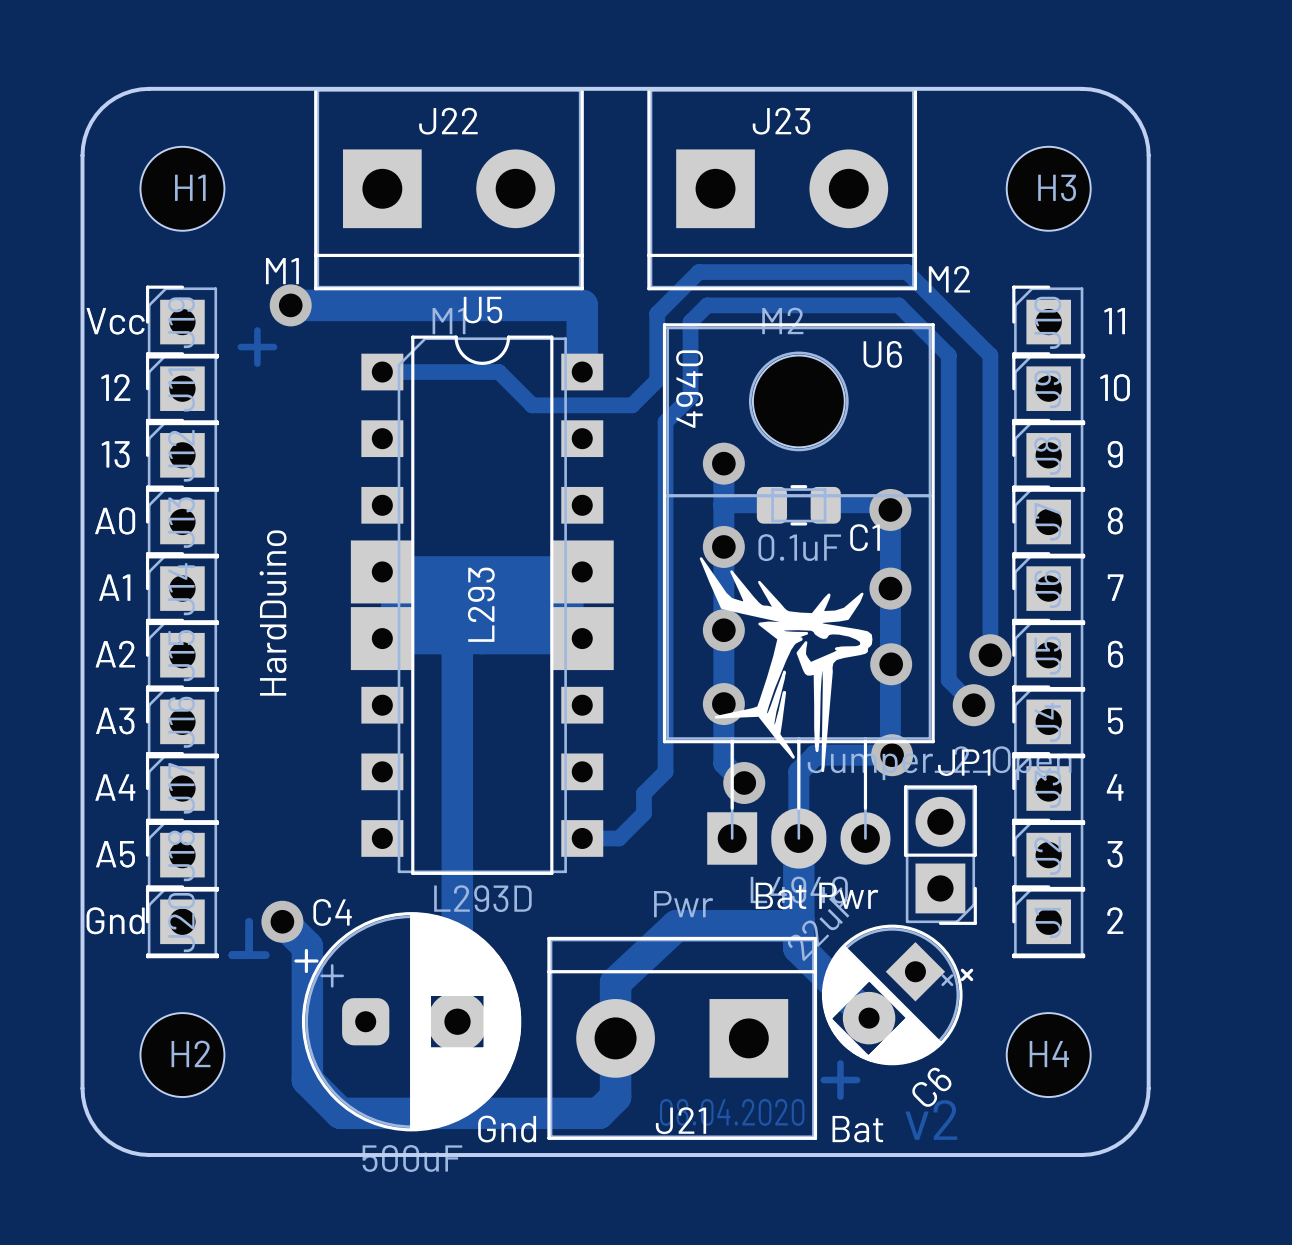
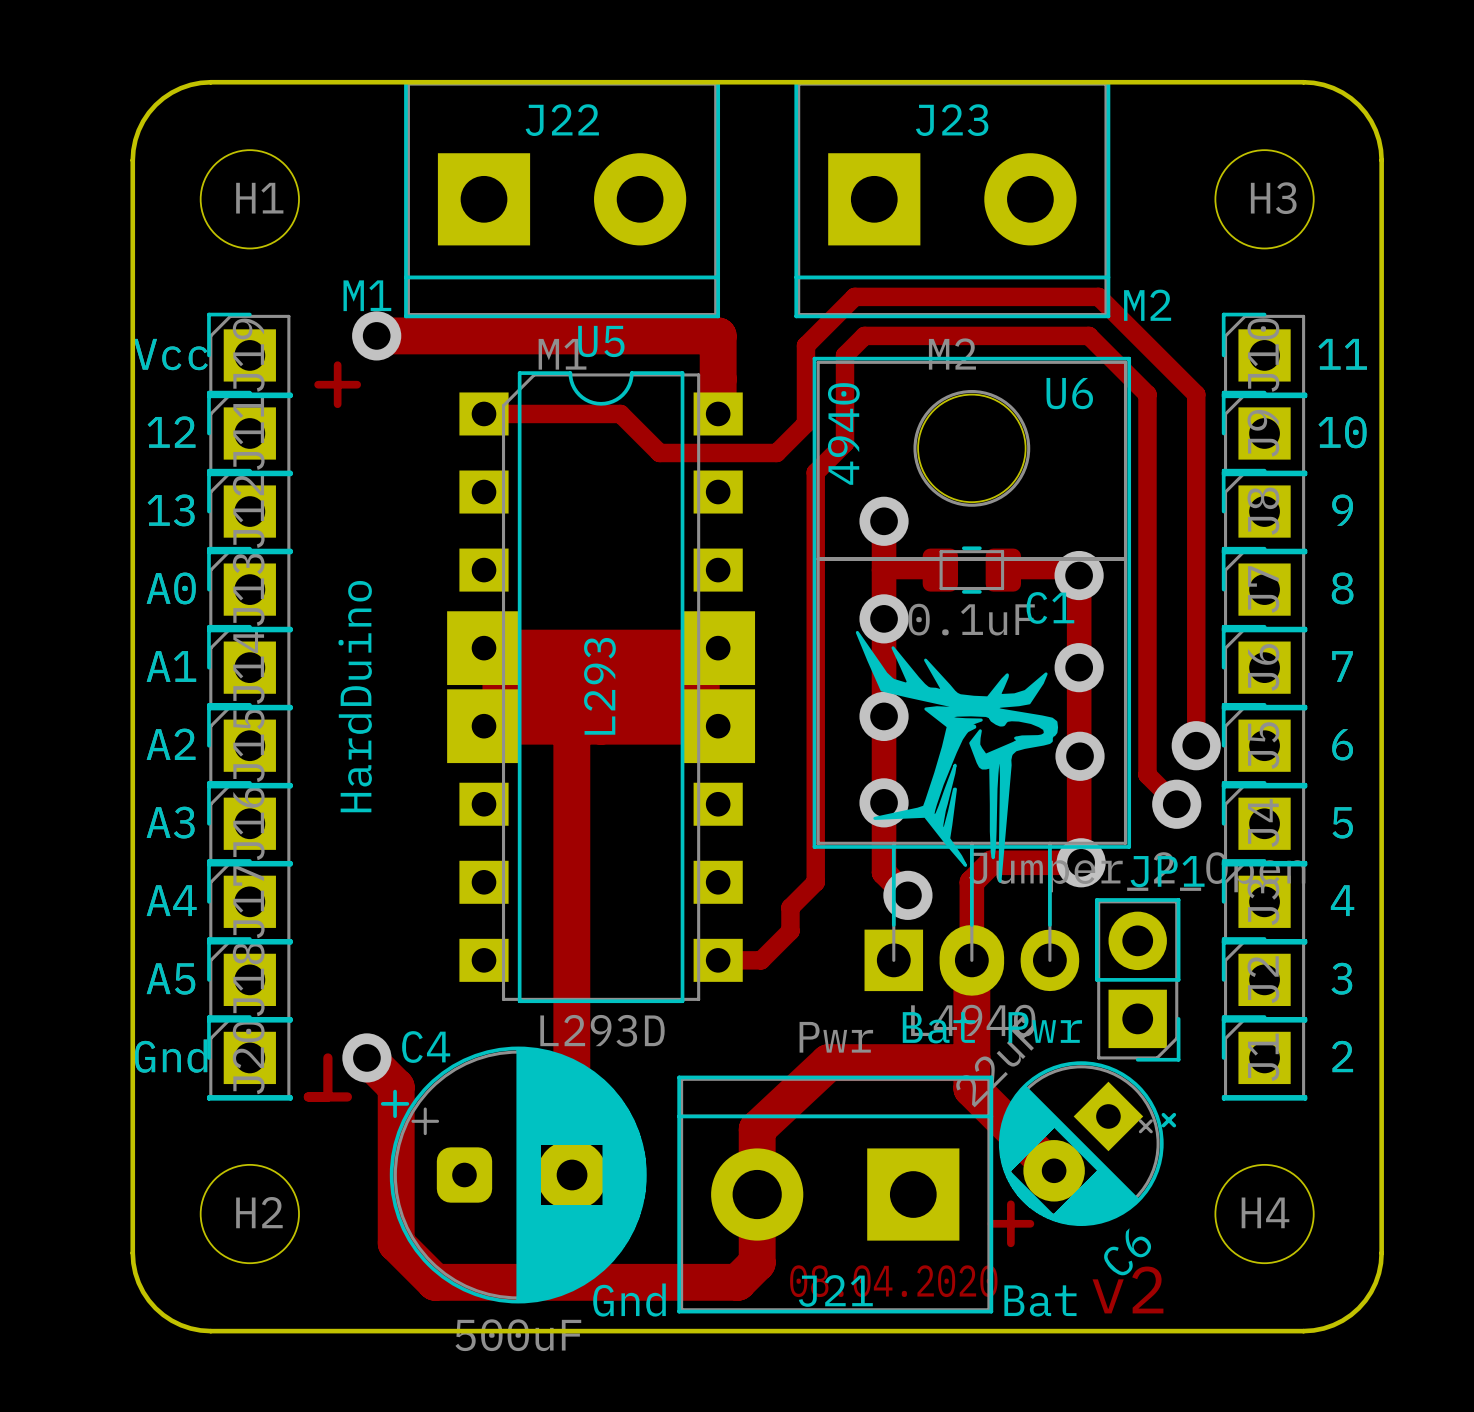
track: (840, 1063) (840, 1096) -> (1010, 1204) (1010, 1243)
track: (823, 1080) (857, 1080) -> (991, 1223) (1030, 1223)

